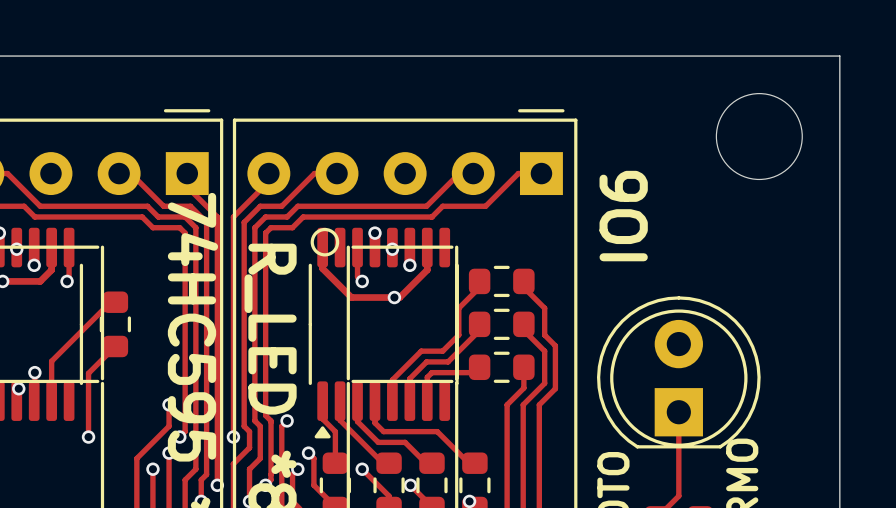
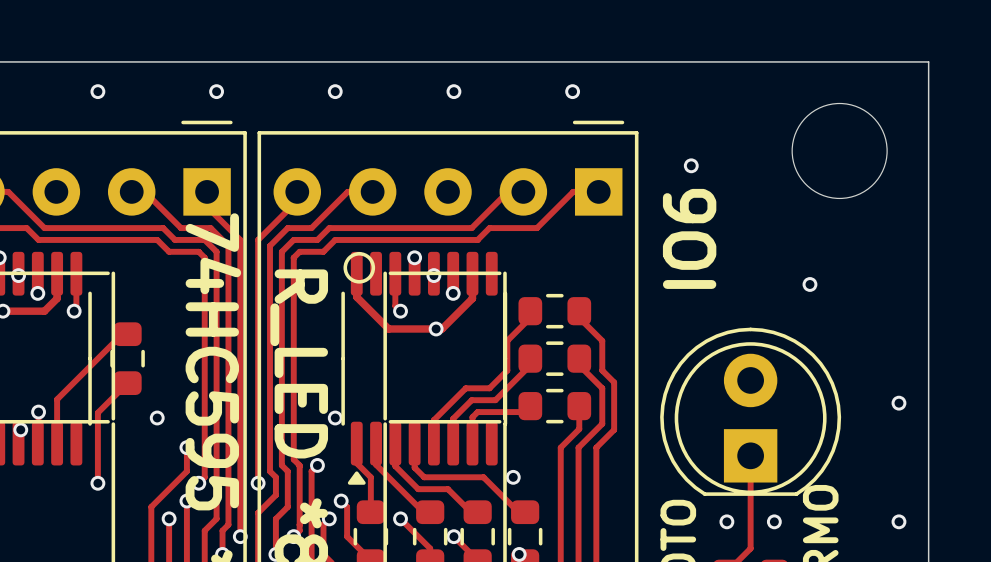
via: none -> (97, 91)
via: none -> (216, 91)
via: none -> (335, 91)
via: none -> (453, 91)
via: none -> (572, 91)
via: none -> (691, 165)
via: none -> (809, 284)
via: none -> (898, 403)
via: none -> (157, 417)
via: none -> (335, 417)
via: none -> (513, 477)
via: none -> (726, 521)
via: none -> (774, 521)
via: none -> (898, 521)

